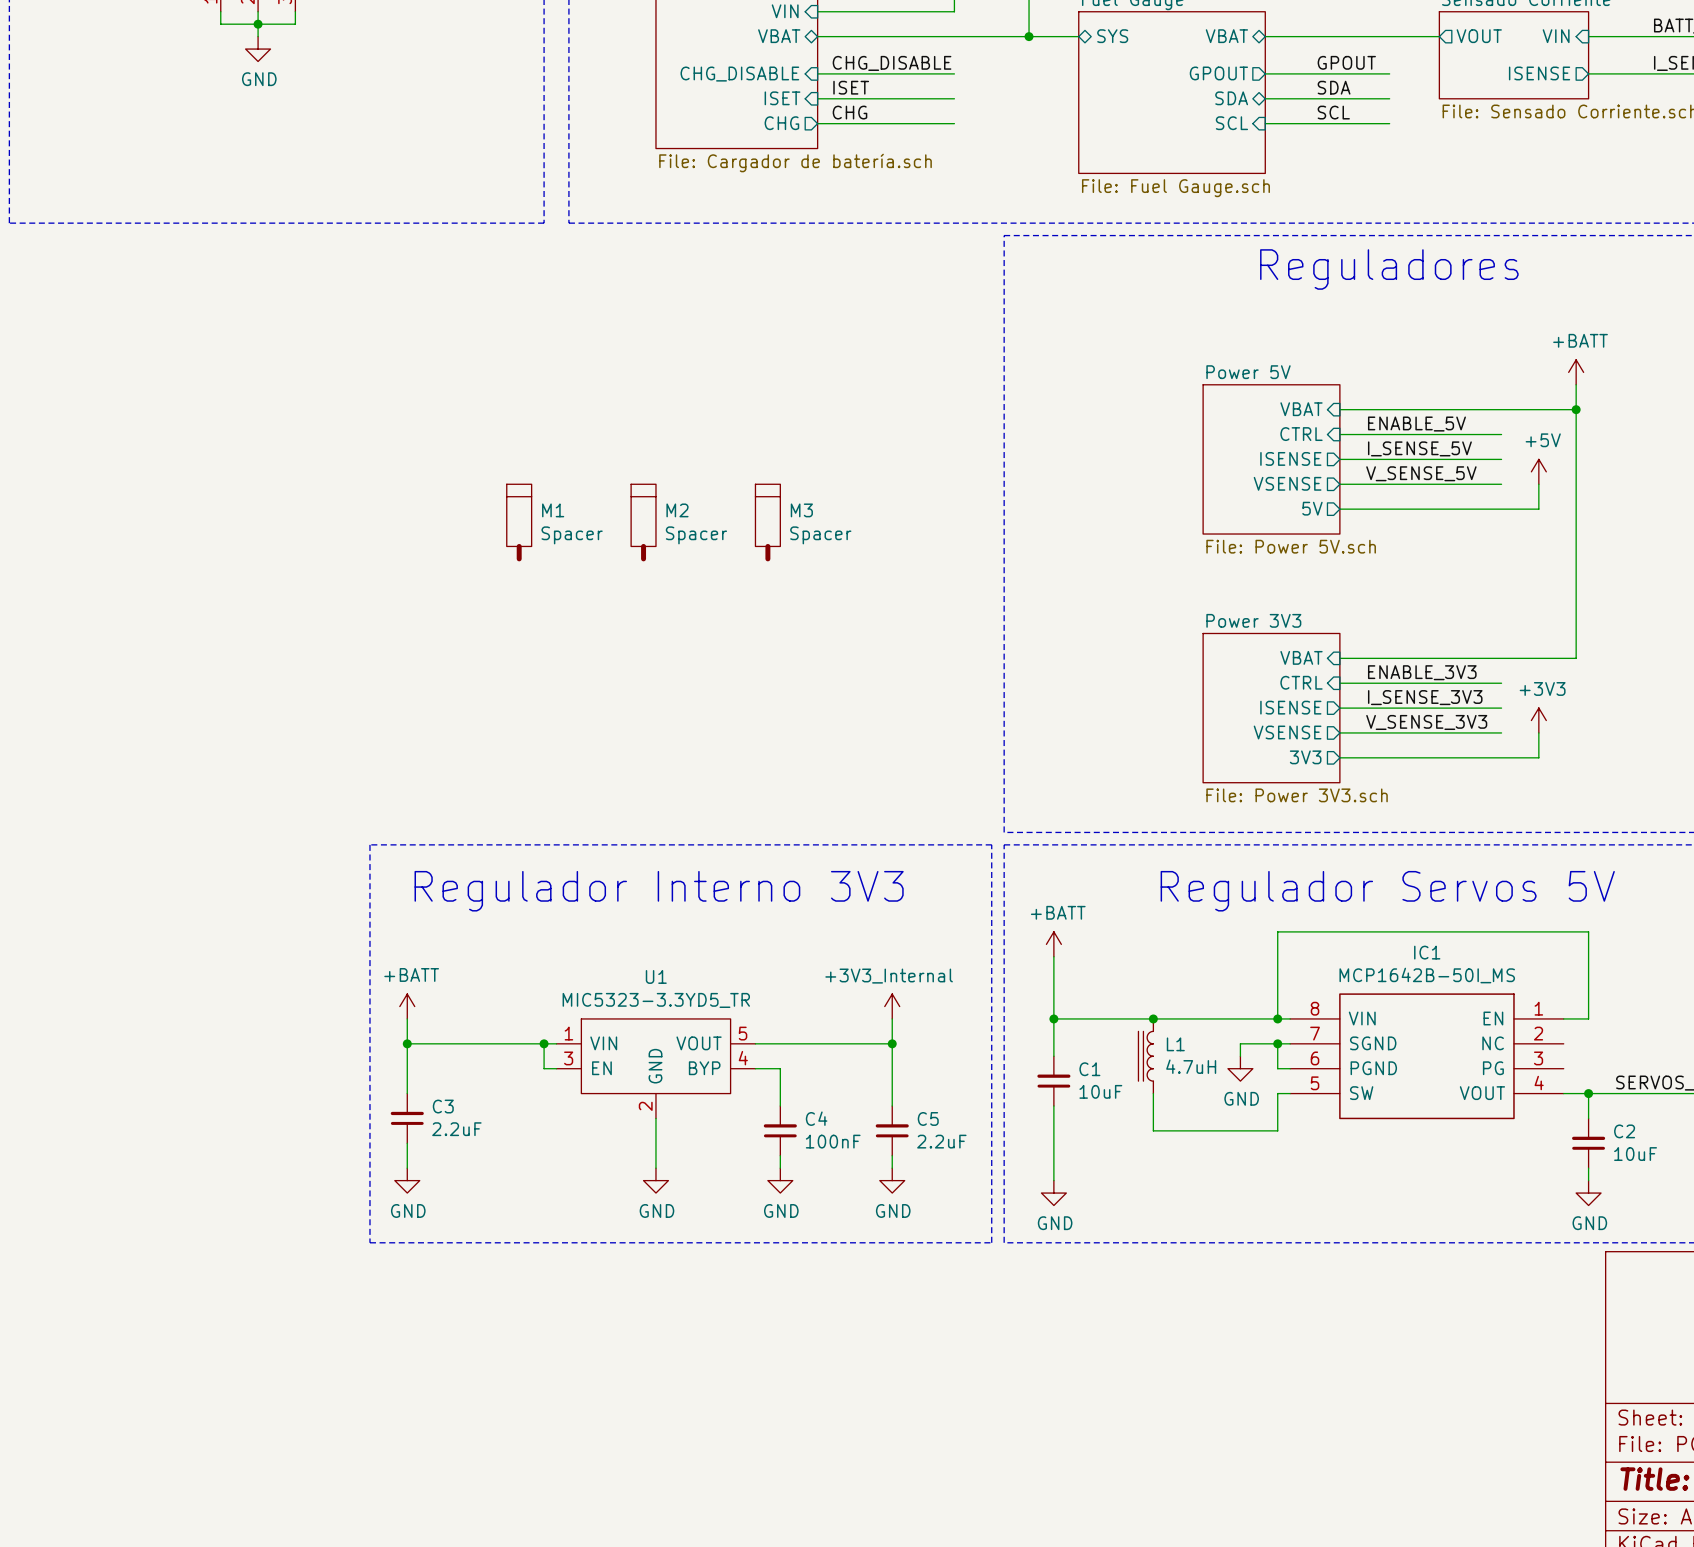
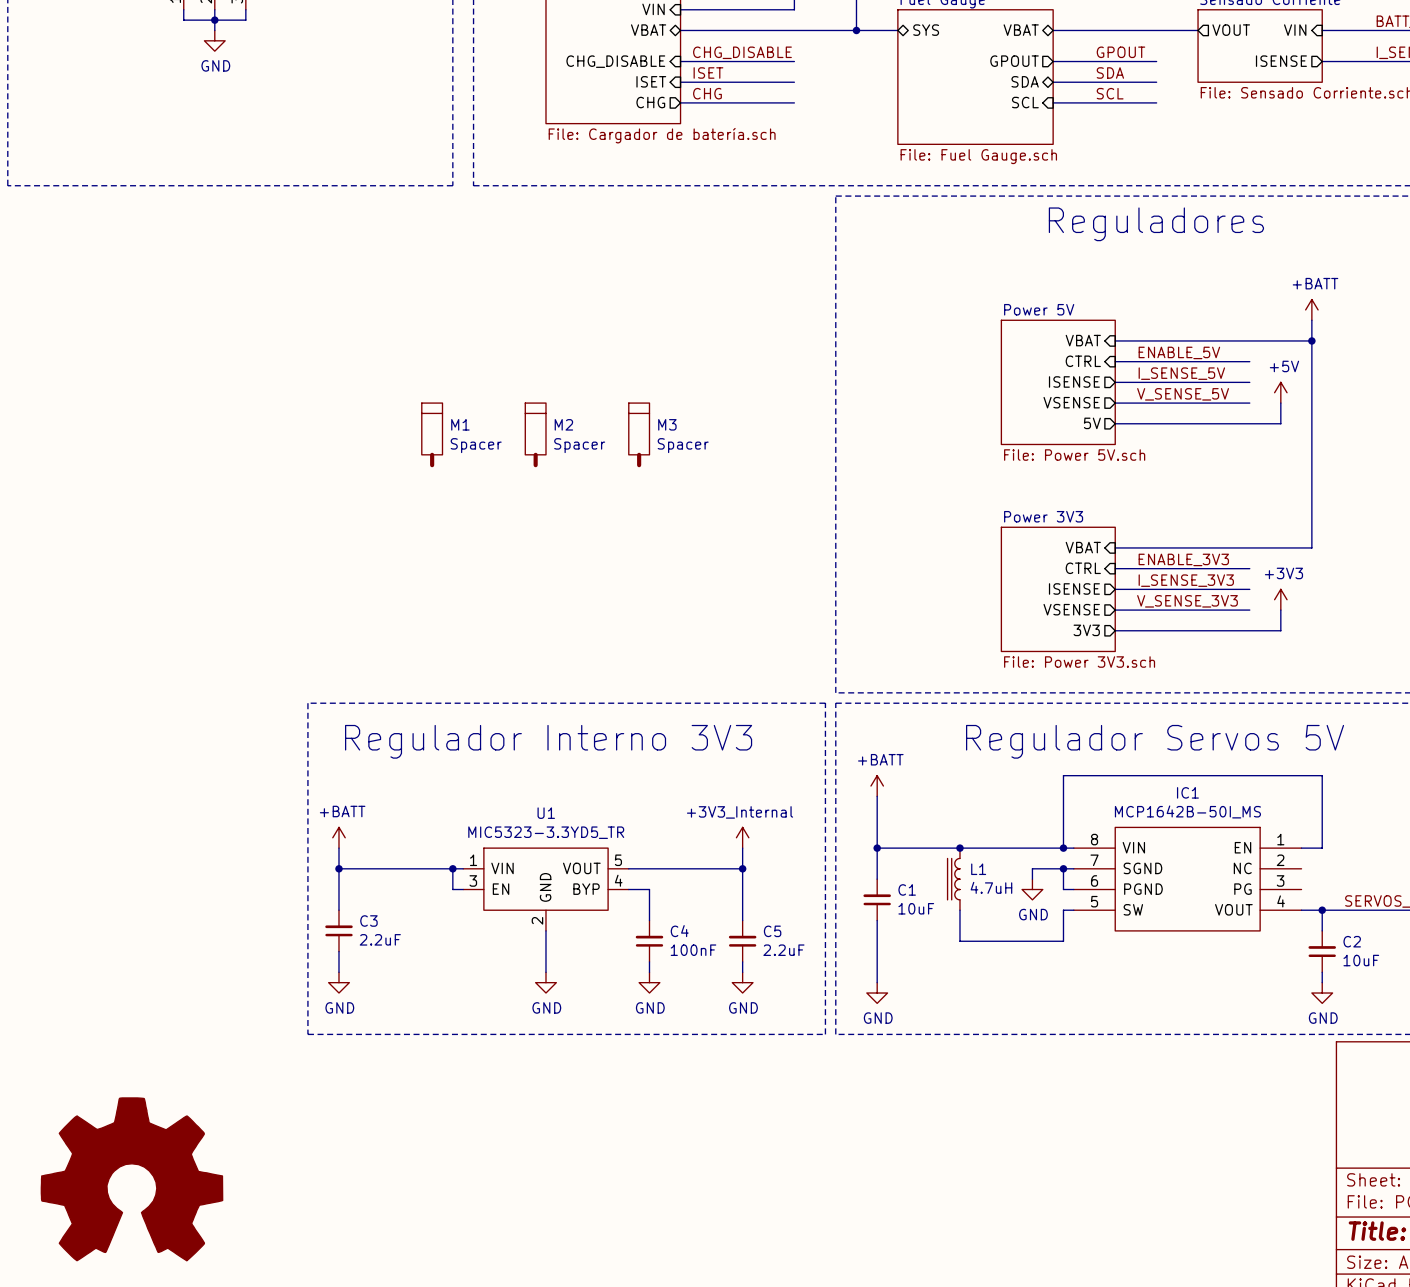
power symbol: none -> (132, 1179)

